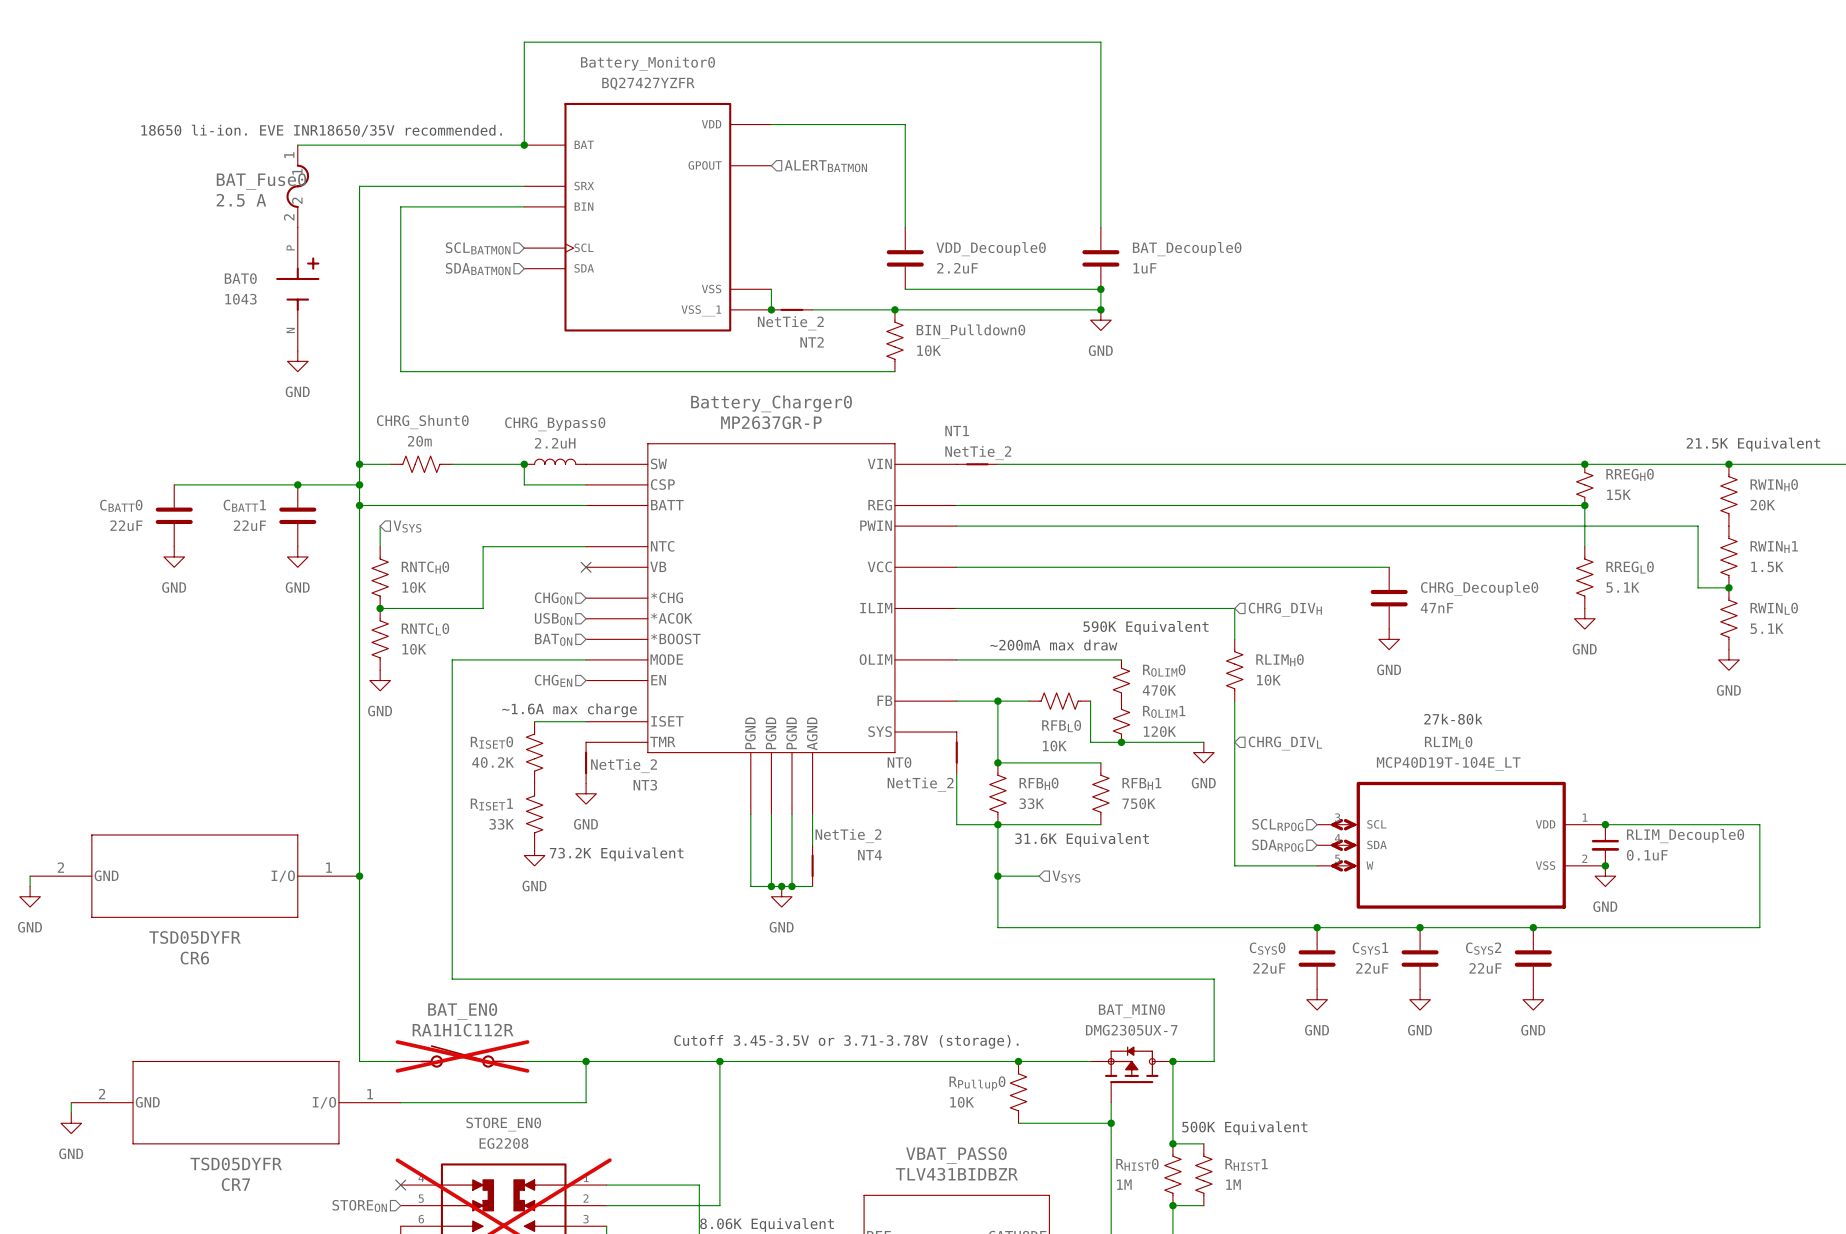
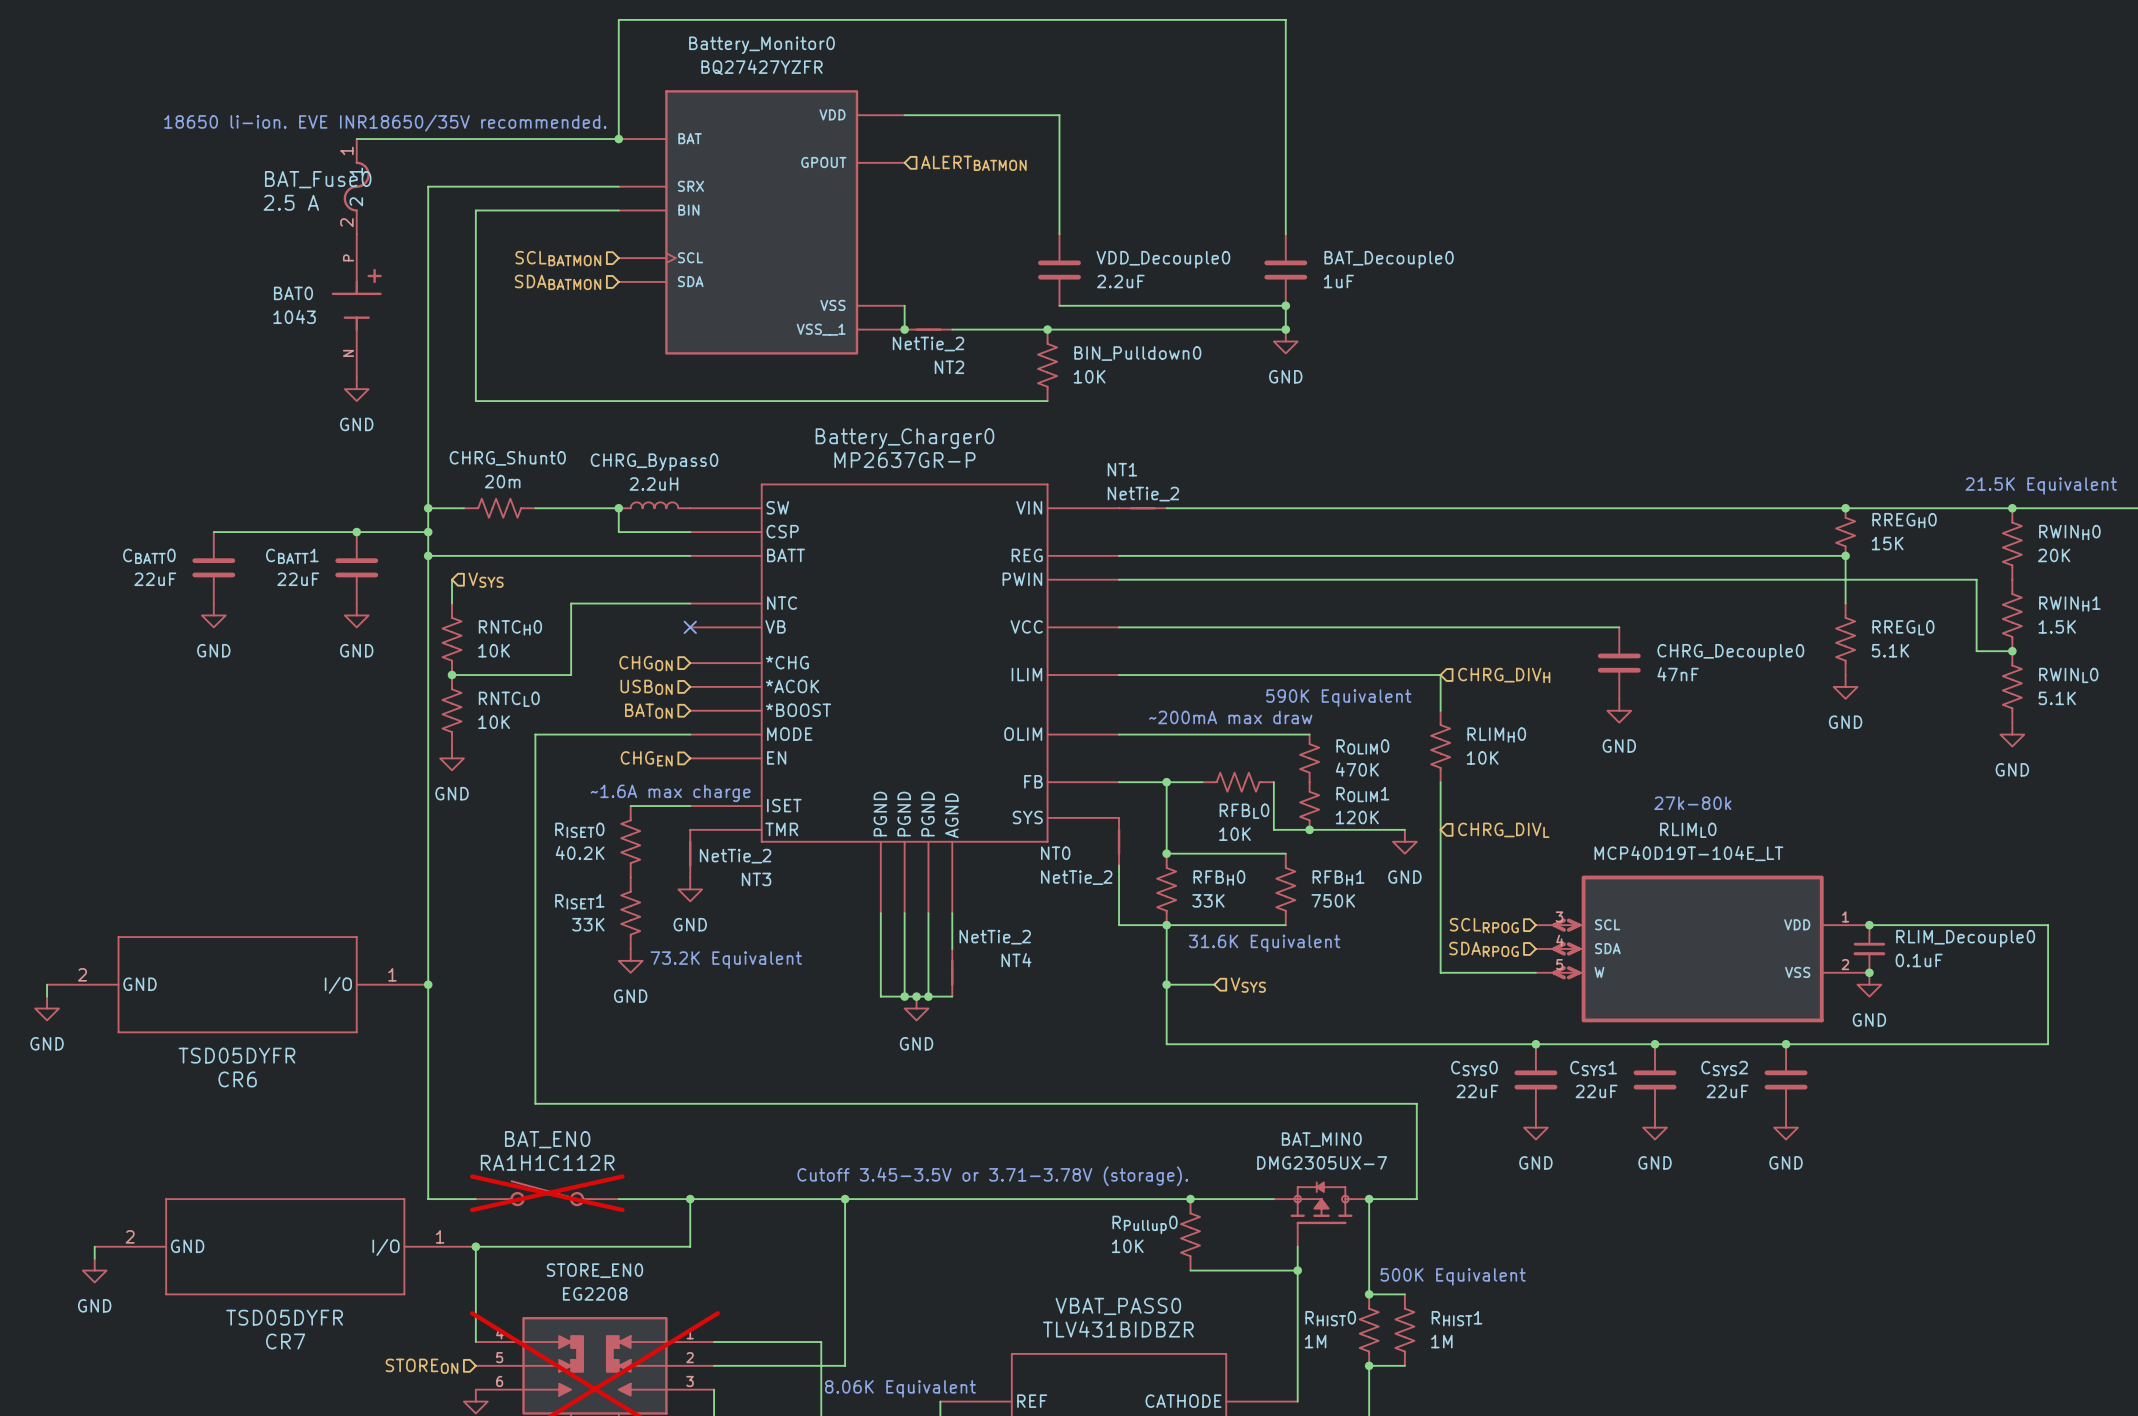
wire: none -> (475, 1246) (475, 1342)
junction: none -> (475, 1246)
no-connect mark: (400, 1185) -> none

